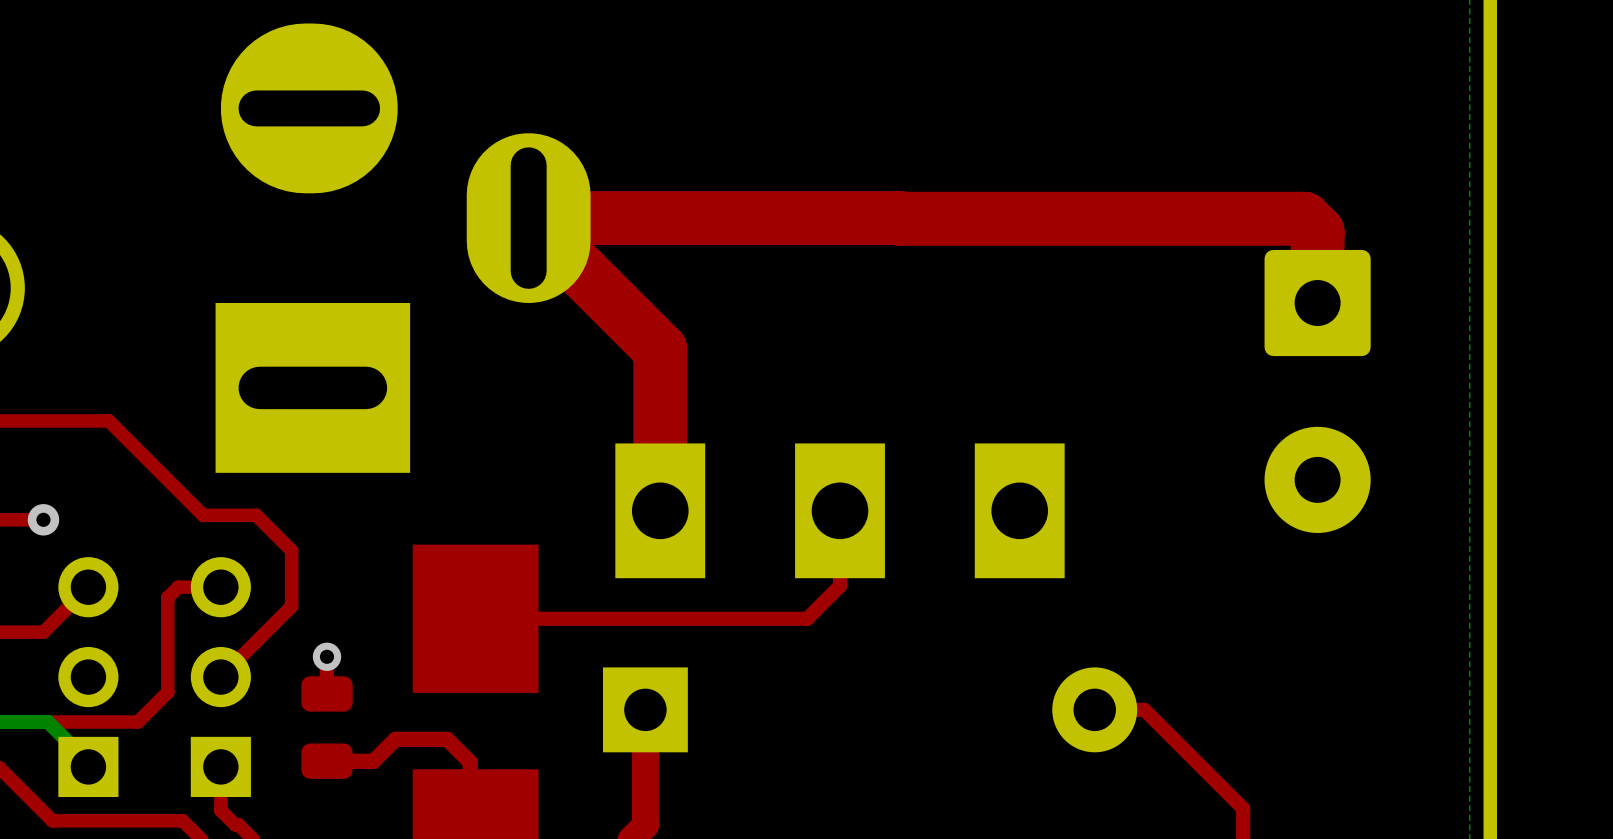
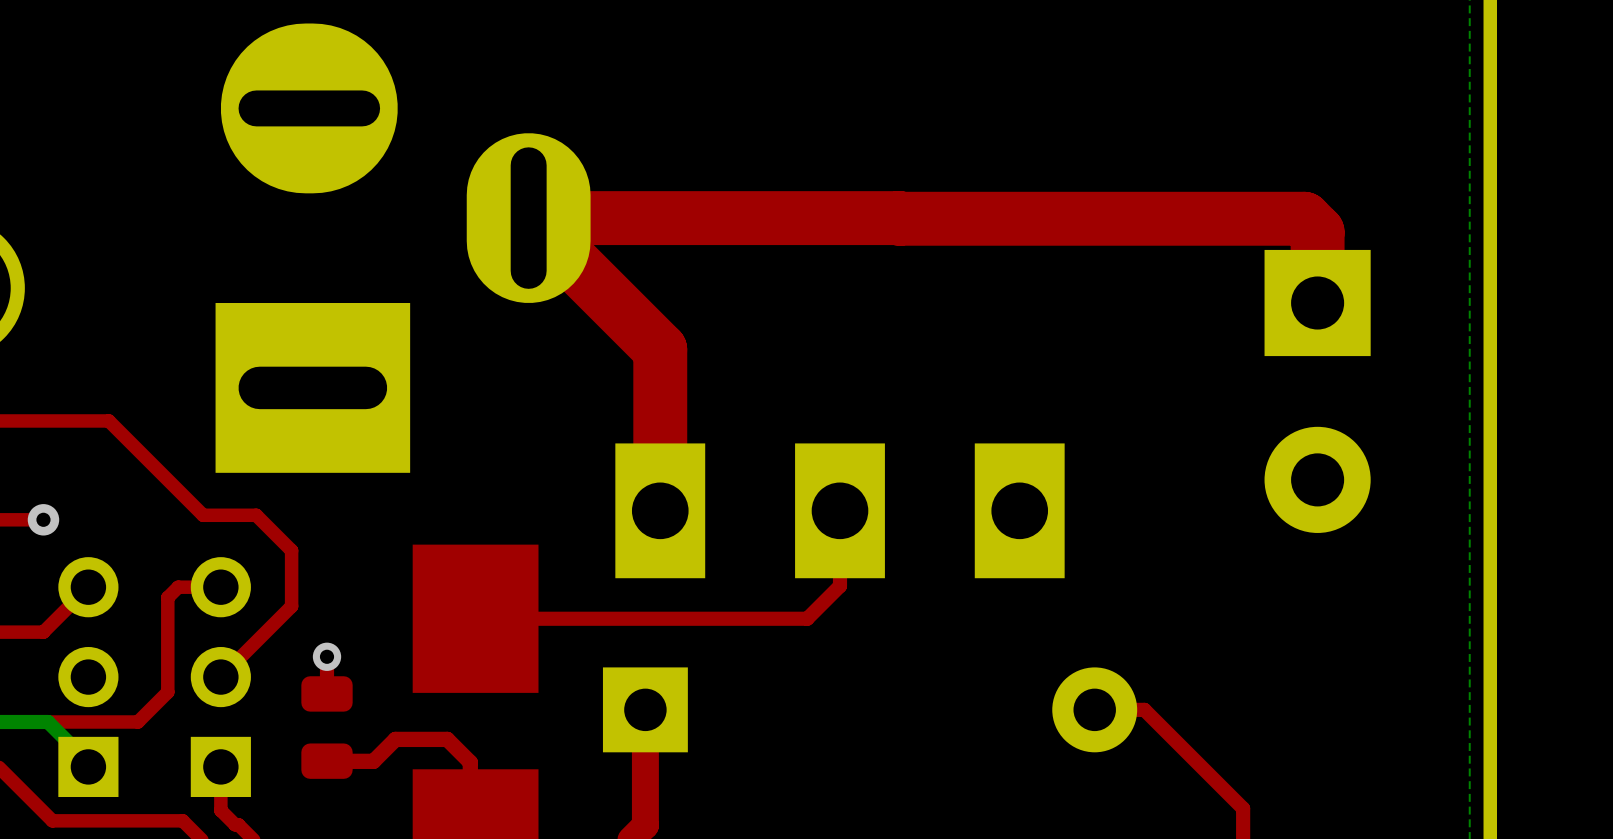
part footprint: [1264, 249, 1371, 533] -> [1264, 249, 1371, 533]

